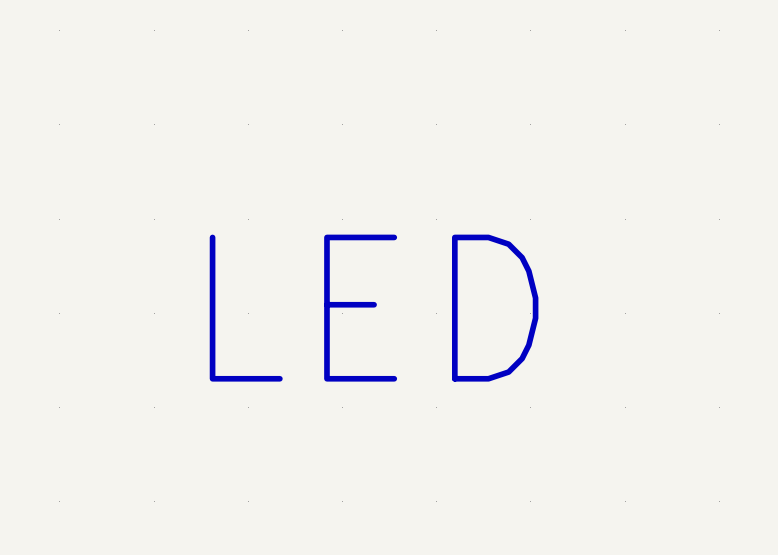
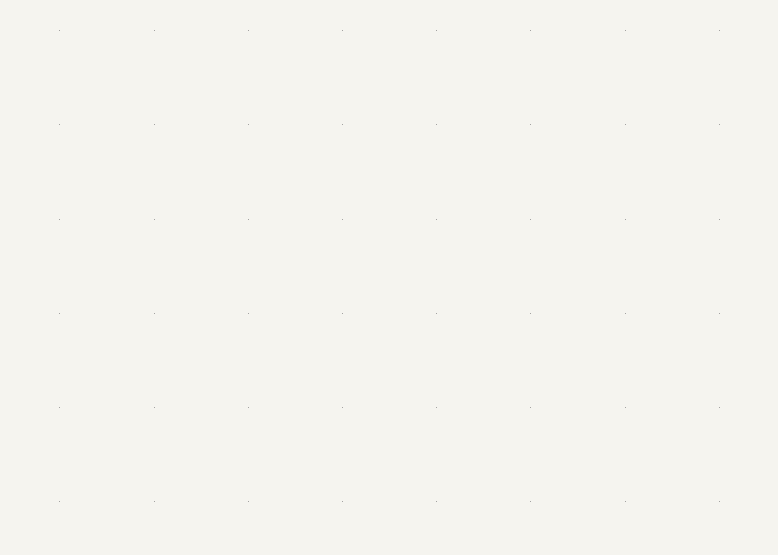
text: LED (374, 308) -> none

